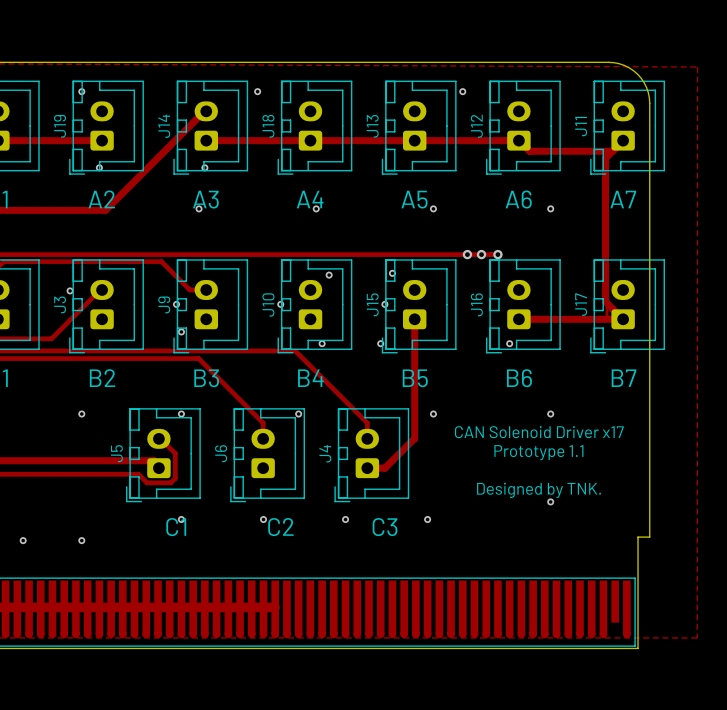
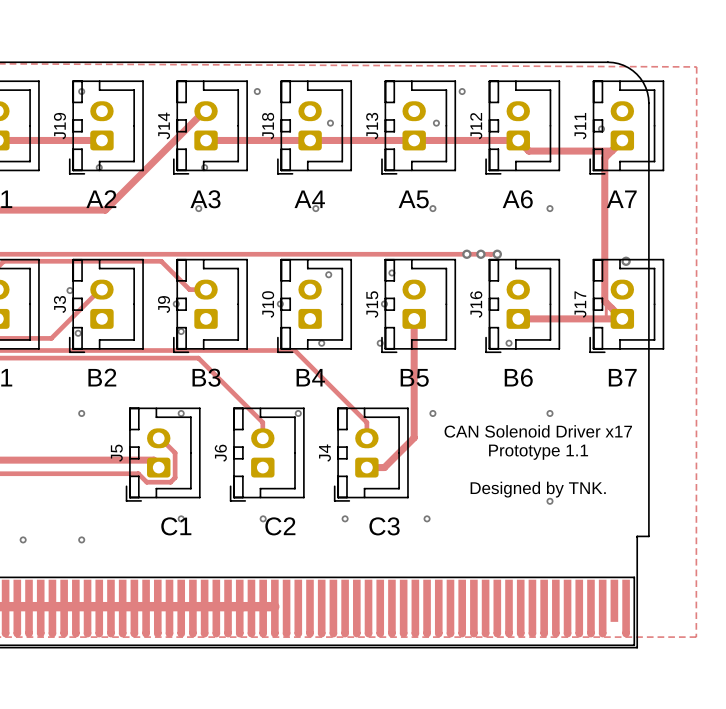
via: none -> (330, 123)
via: none -> (436, 123)
via: none -> (601, 128)
via: none -> (626, 261)
via: none -> (78, 333)

